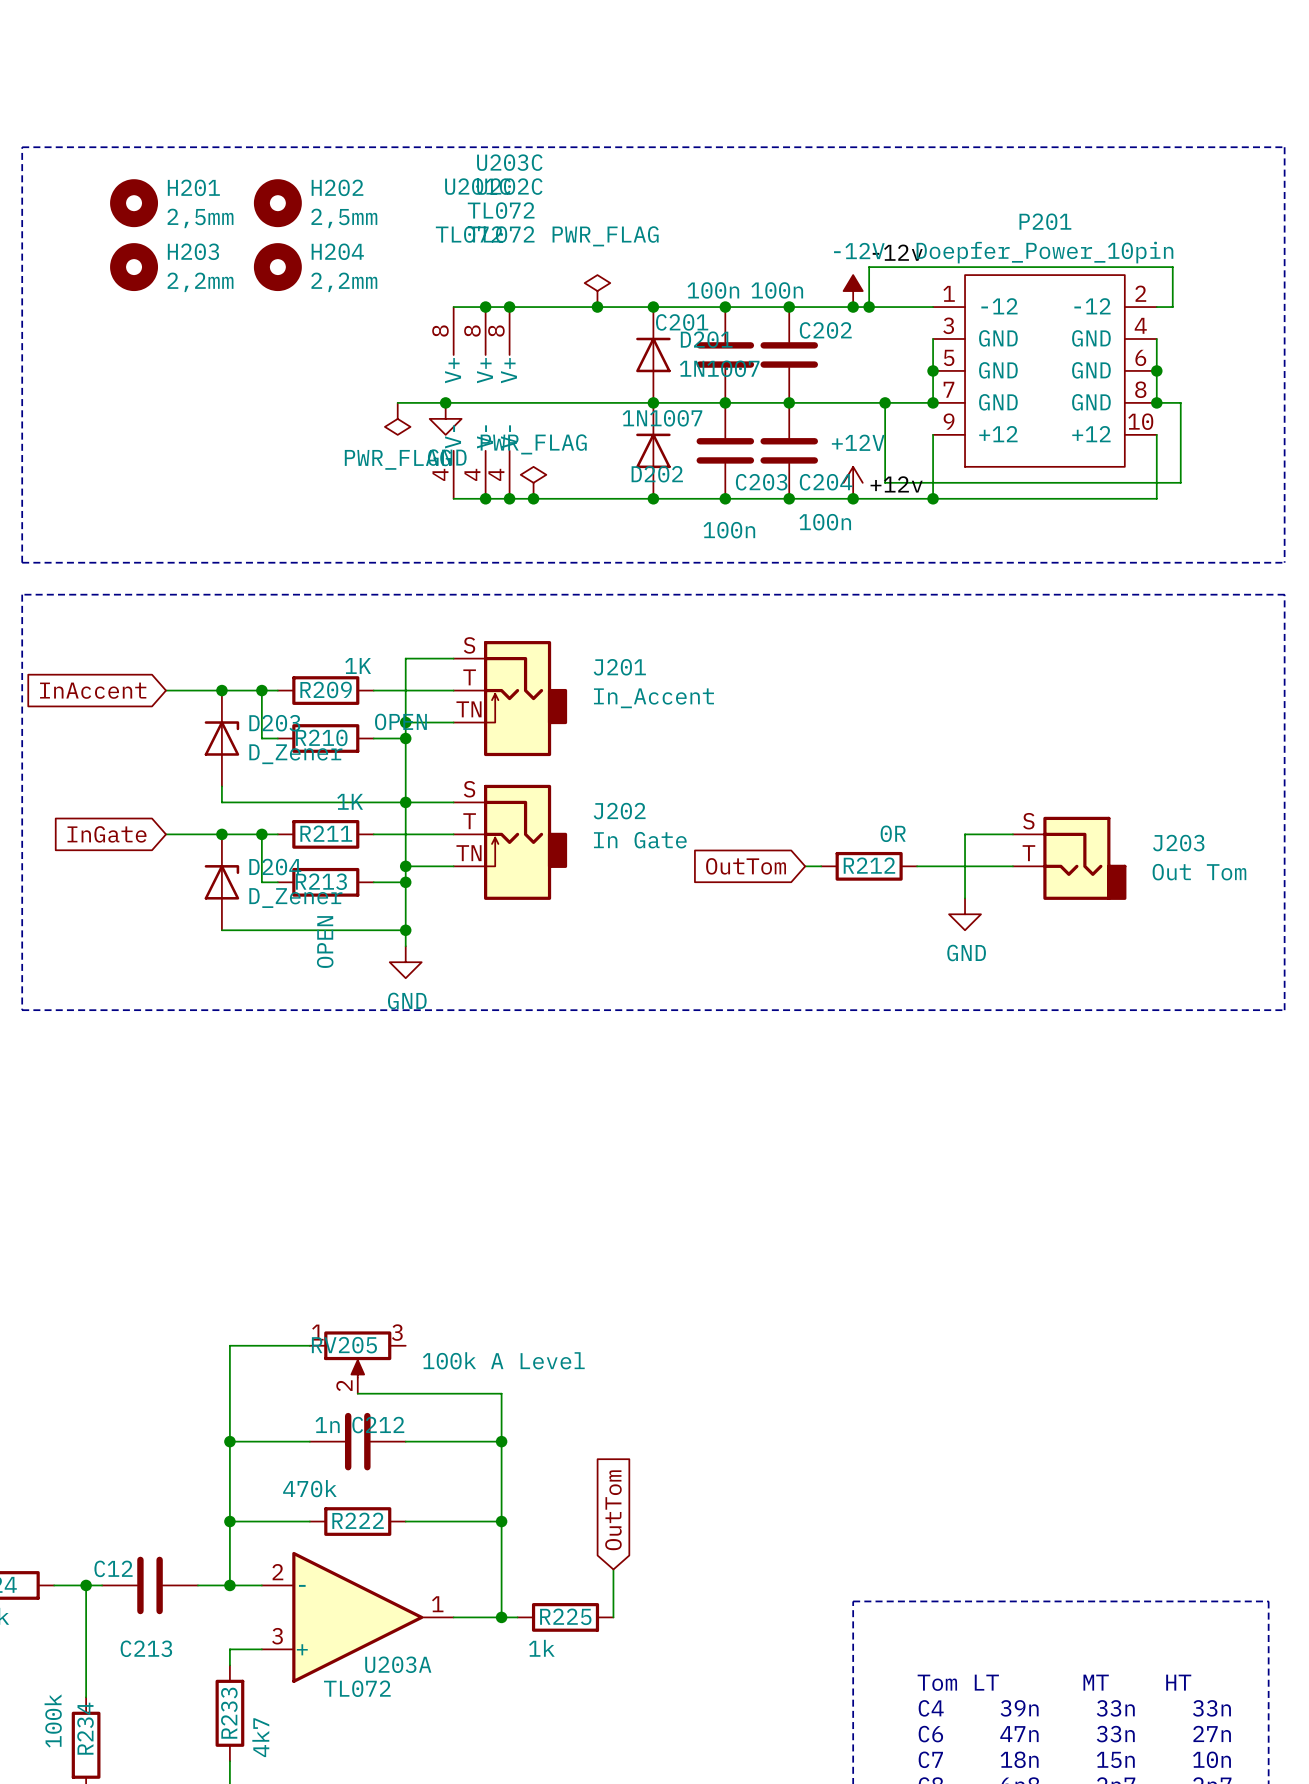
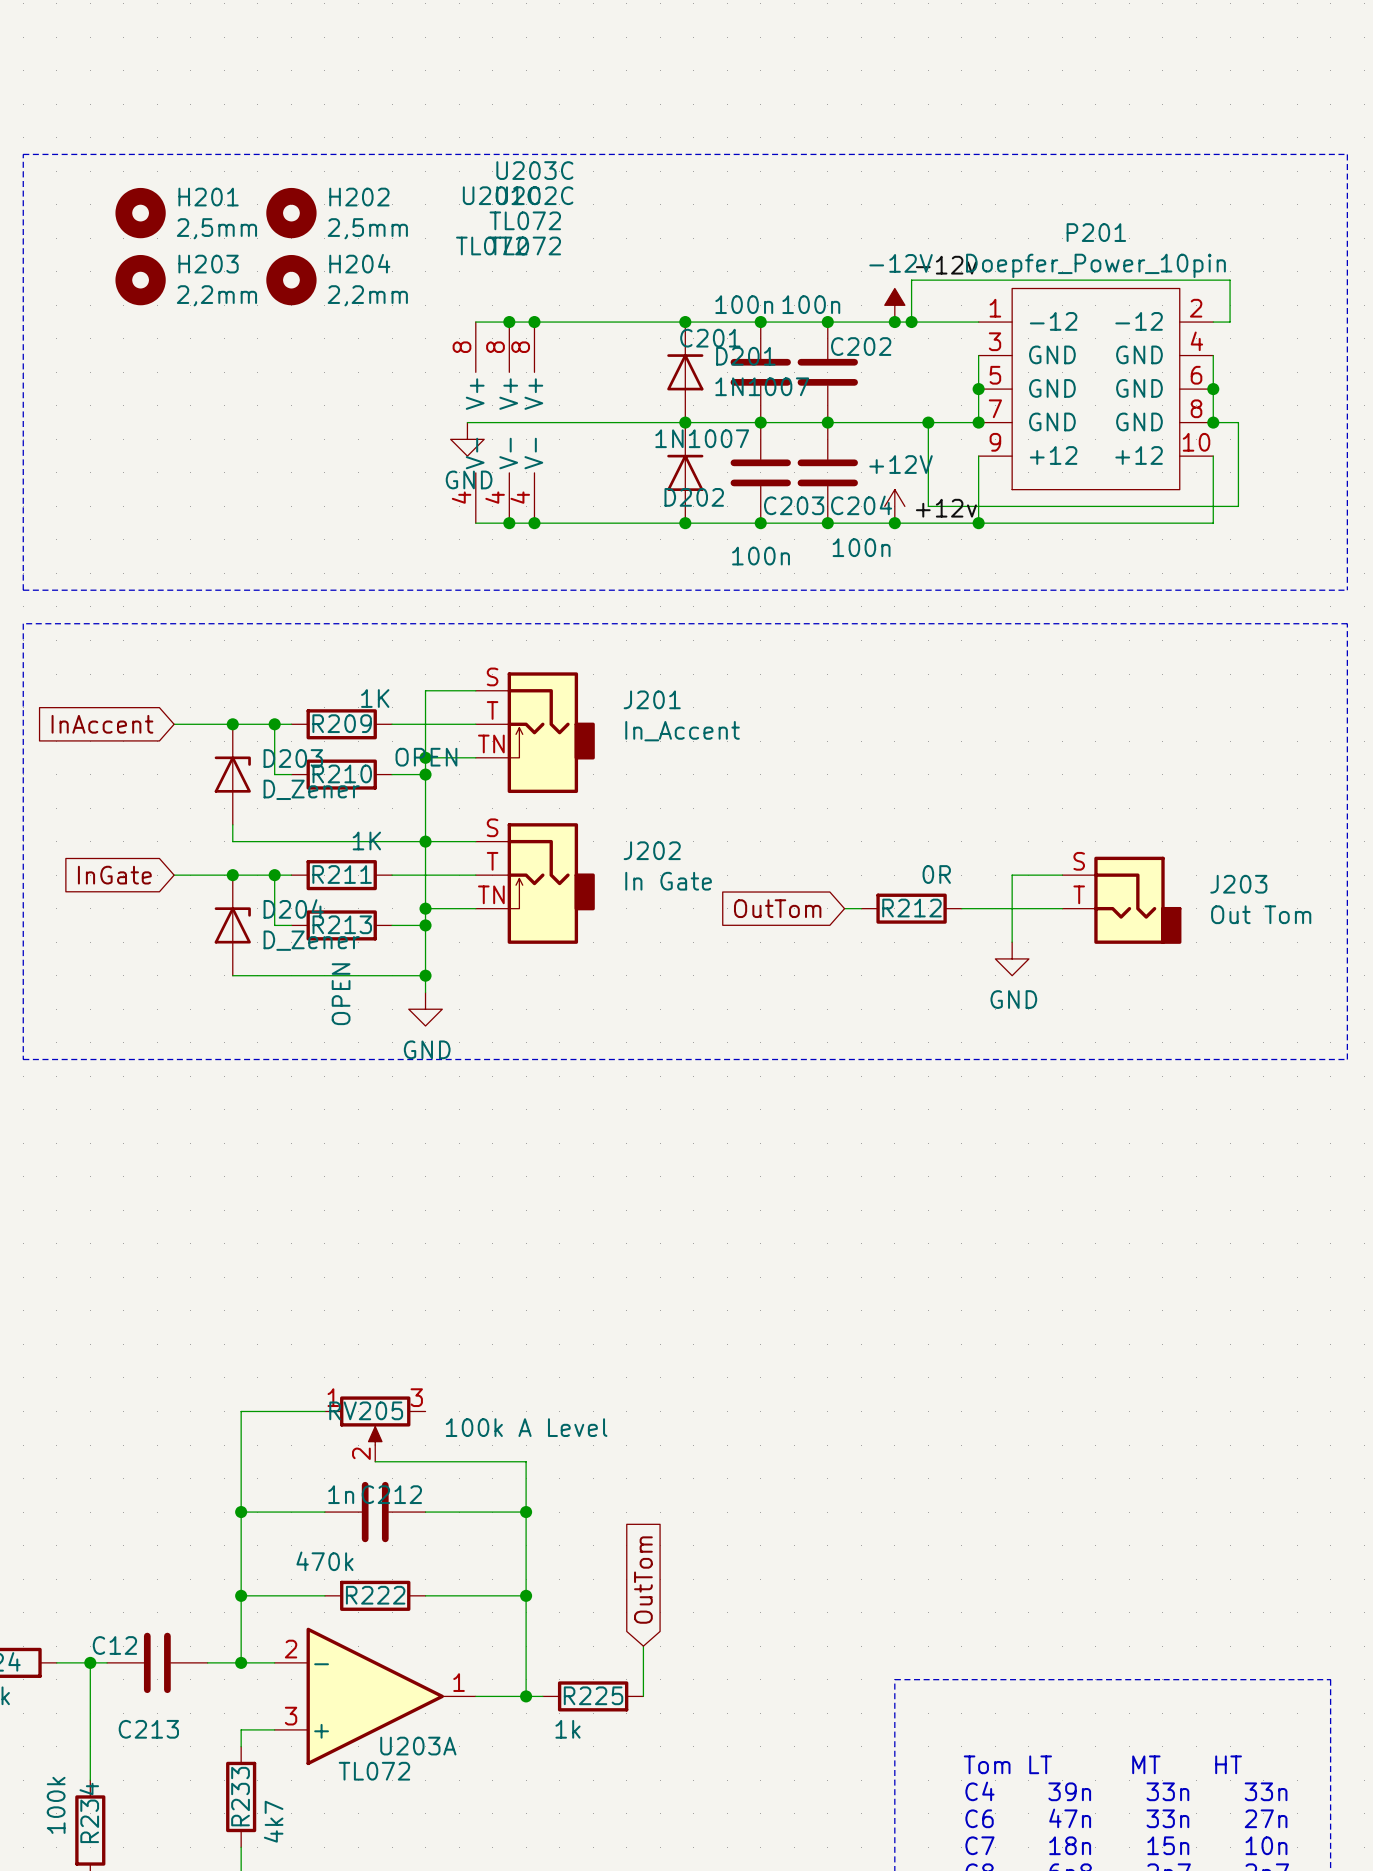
power symbol: PWR_FLAG (597, 291) -> none
junction: (597, 307) -> none
wire: (397, 402) (445, 402) -> none
junction: (445, 402) -> none
power symbol: PWR_FLAG (397, 418) -> none
power symbol: PWR_FLAG (533, 482) -> none
junction: (533, 498) -> none

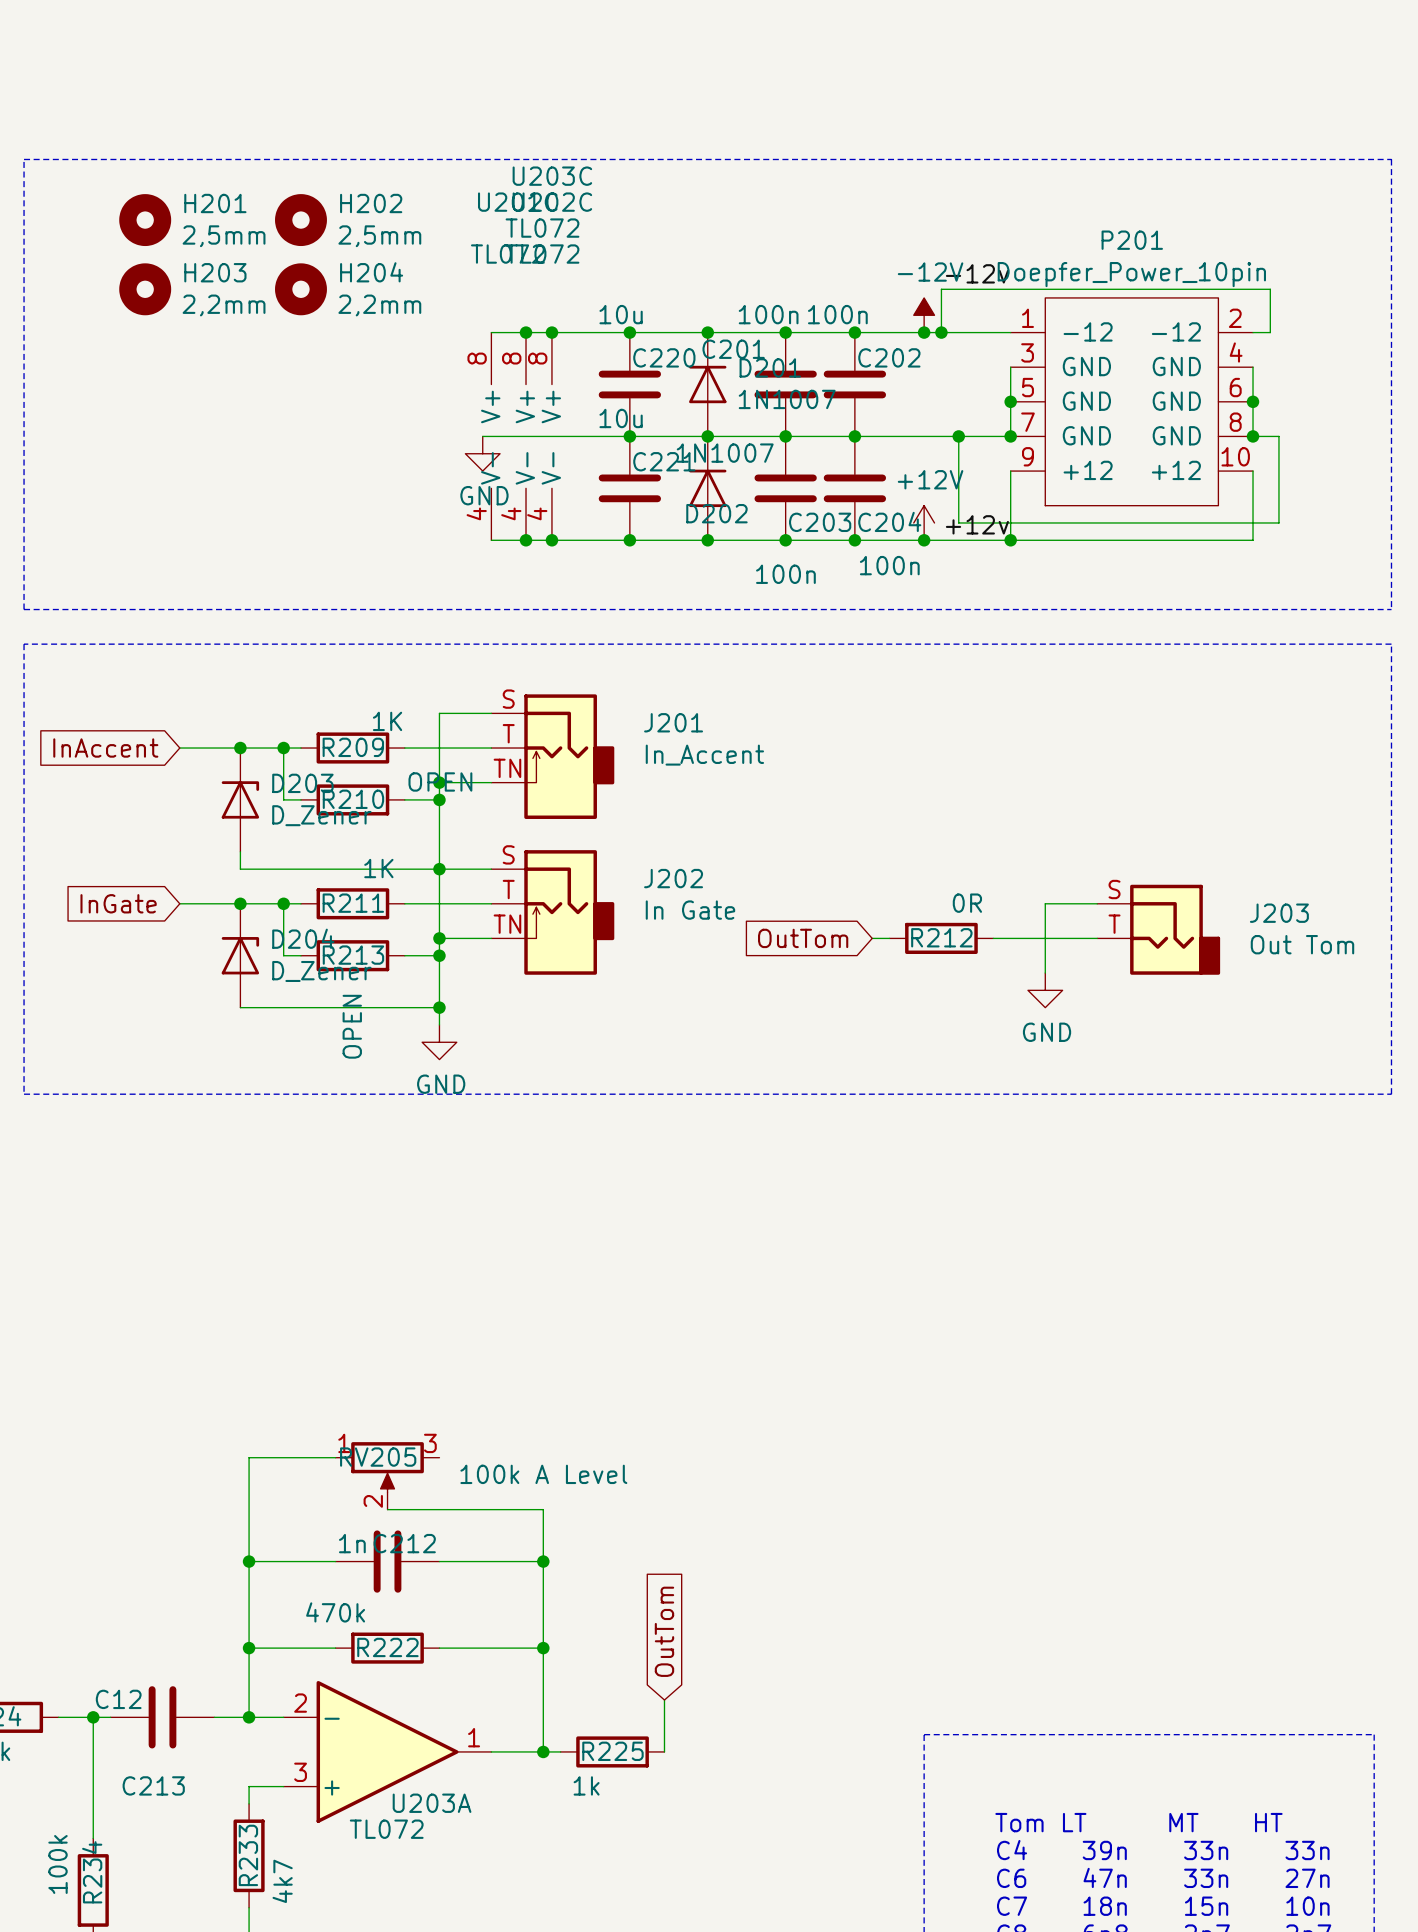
junction: none -> (629, 332)
C220: none -> 10u (629, 384)
junction: none -> (629, 436)
C221: none -> 10u (629, 488)
junction: none -> (629, 540)

